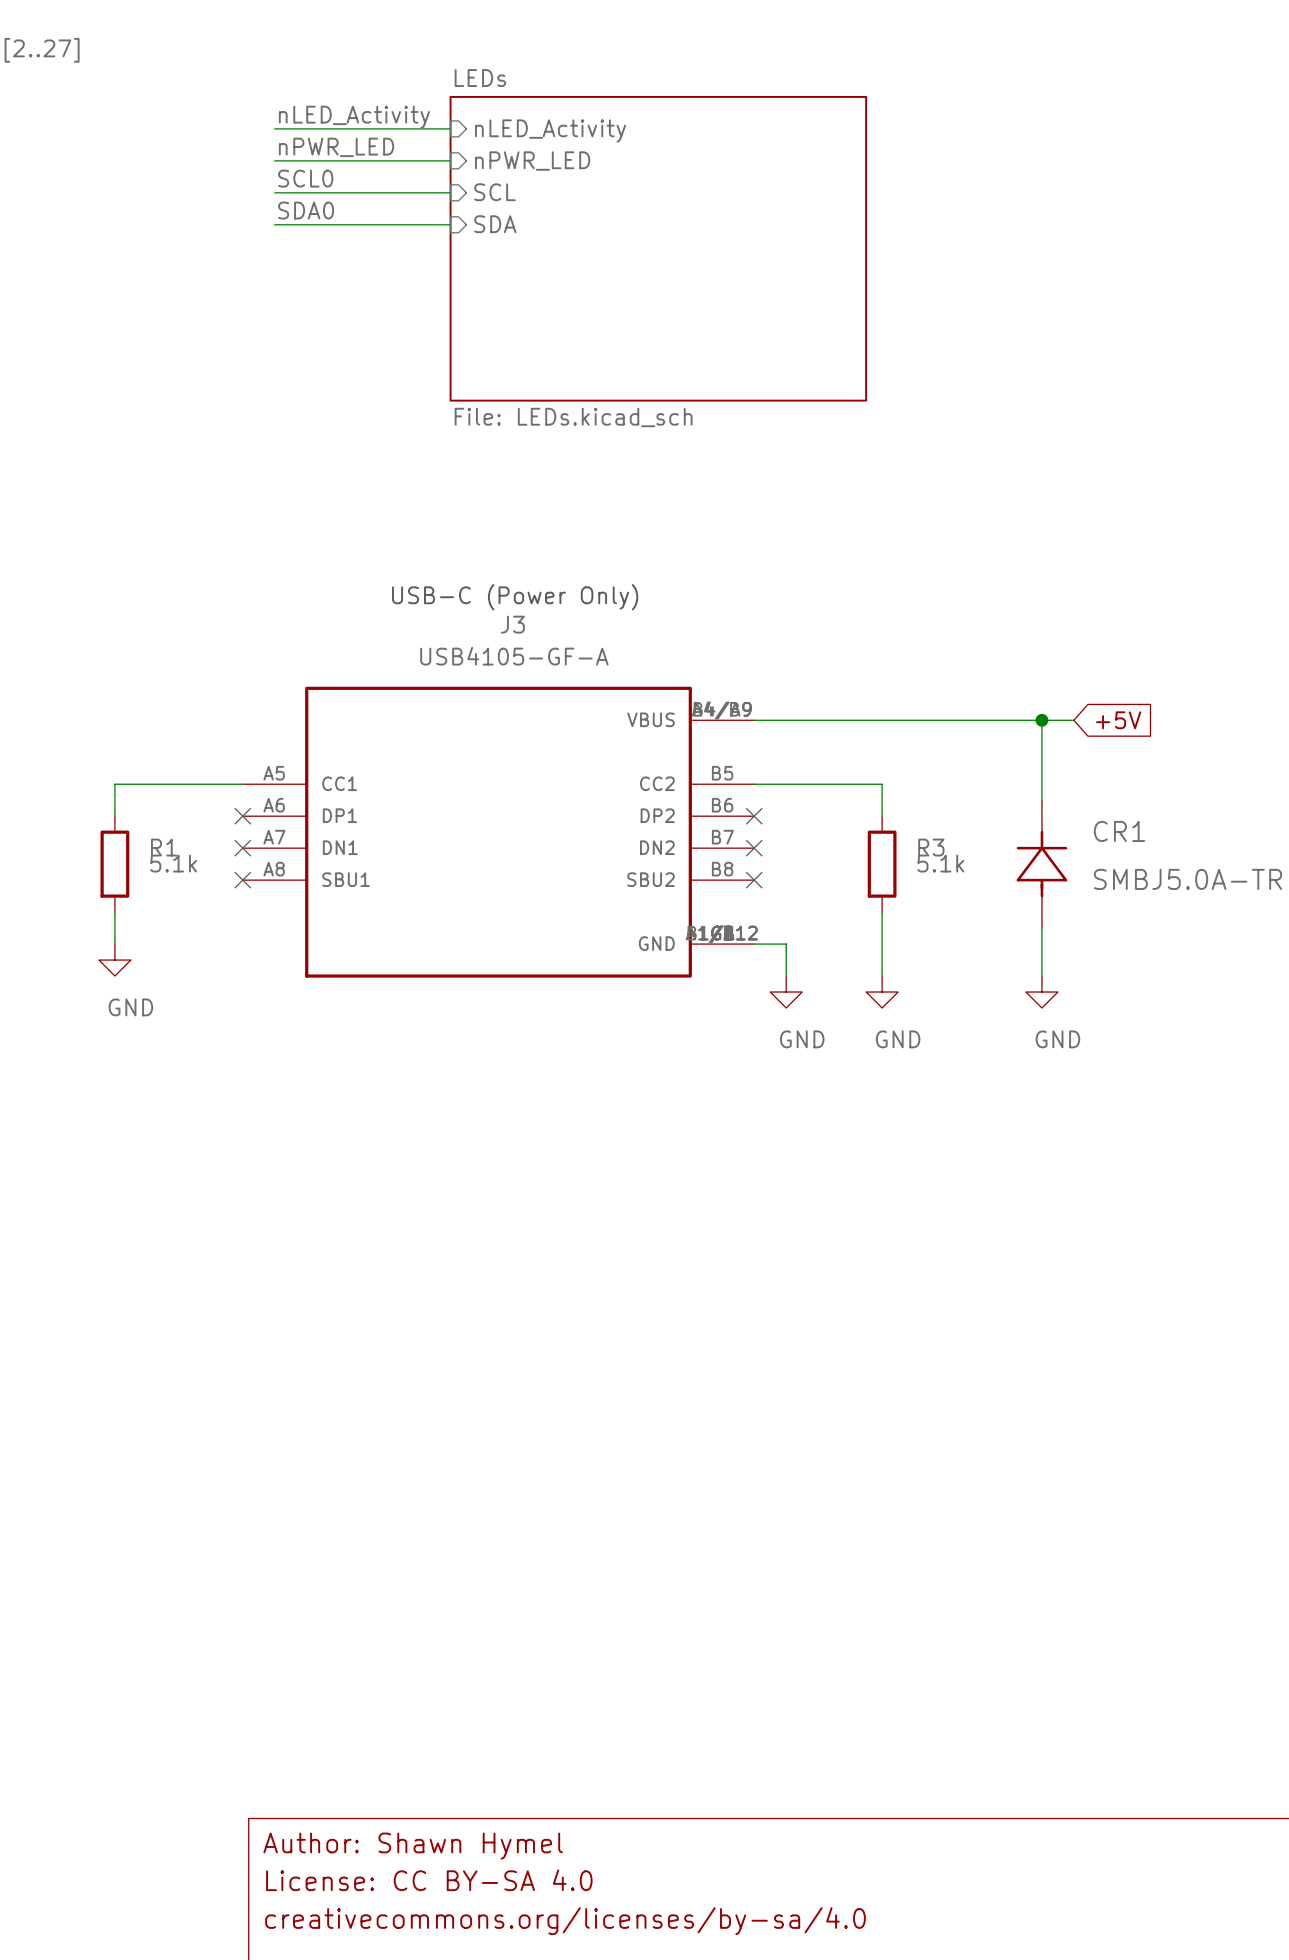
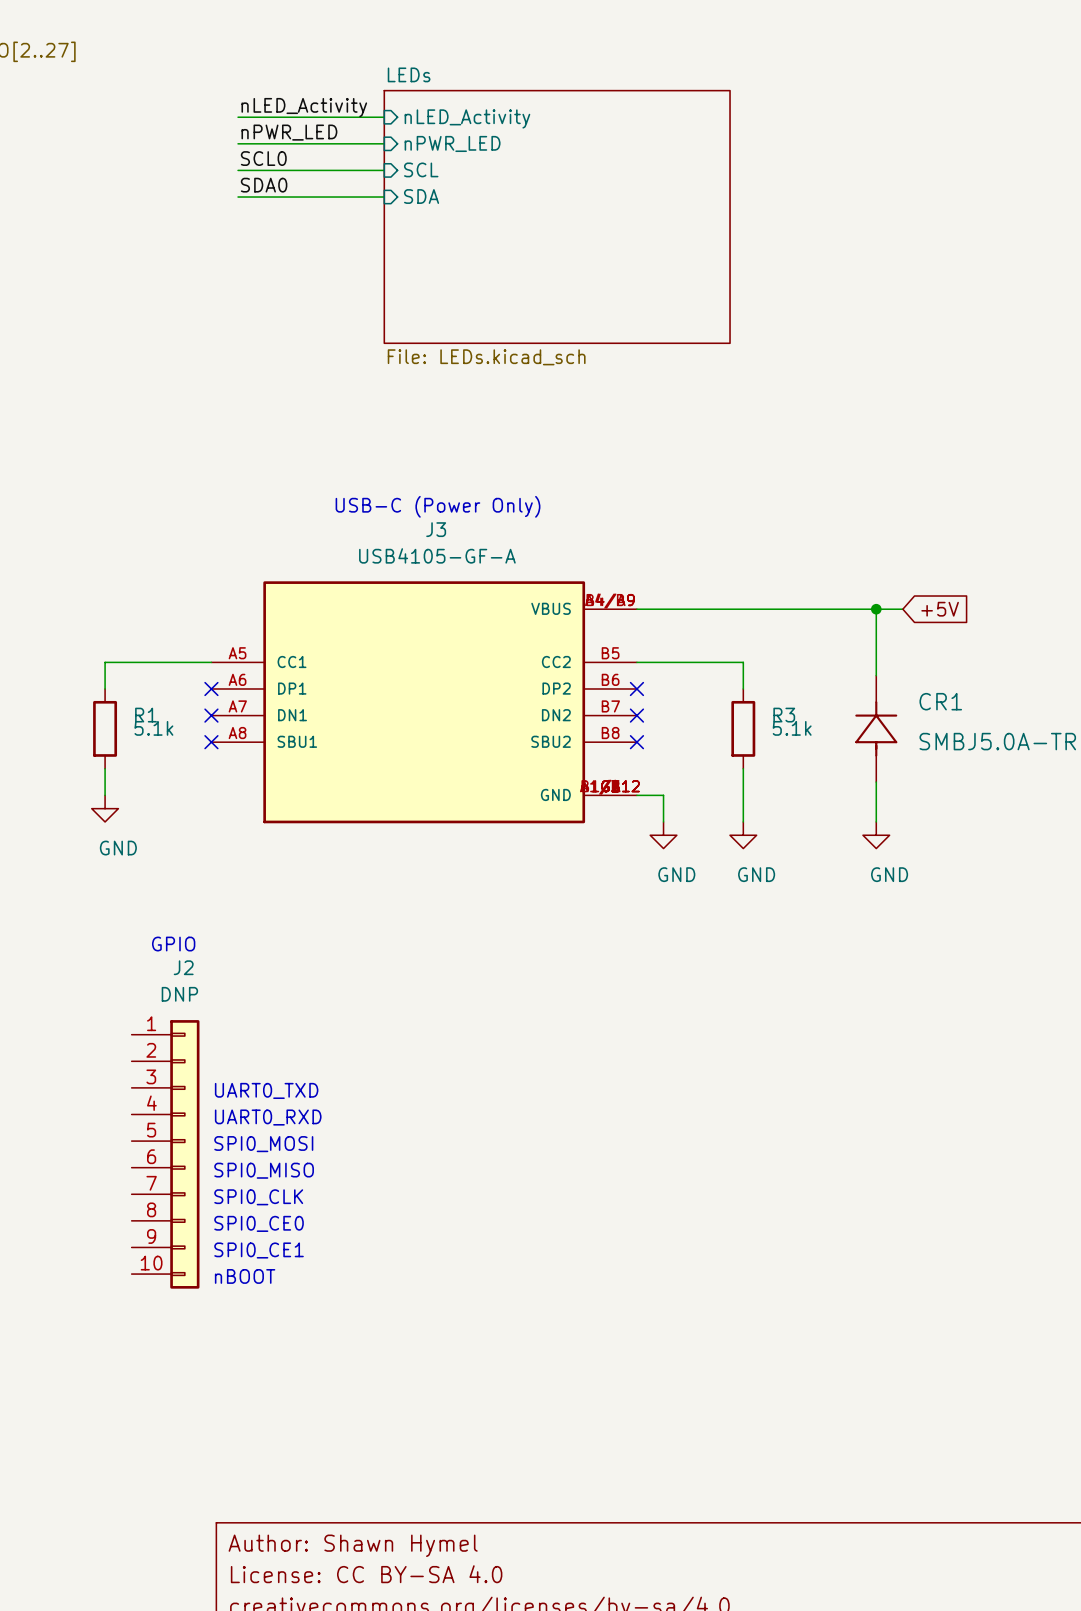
text: none -> GPIO (173, 944)
text: none -> UART0_TXD (266, 1090)
text: none -> UART0_RXD (268, 1117)
text: none -> SPI0_MOSI (263, 1144)
J2: none -> DNP (165, 1154)
text: none -> SPI0_MISO (264, 1170)
text: none -> SPI0_CLK (258, 1197)
text: none -> SPI0_CE0 (259, 1223)
text: none -> SPI0_CE1 (259, 1250)
text: none -> nBOOT (245, 1276)

